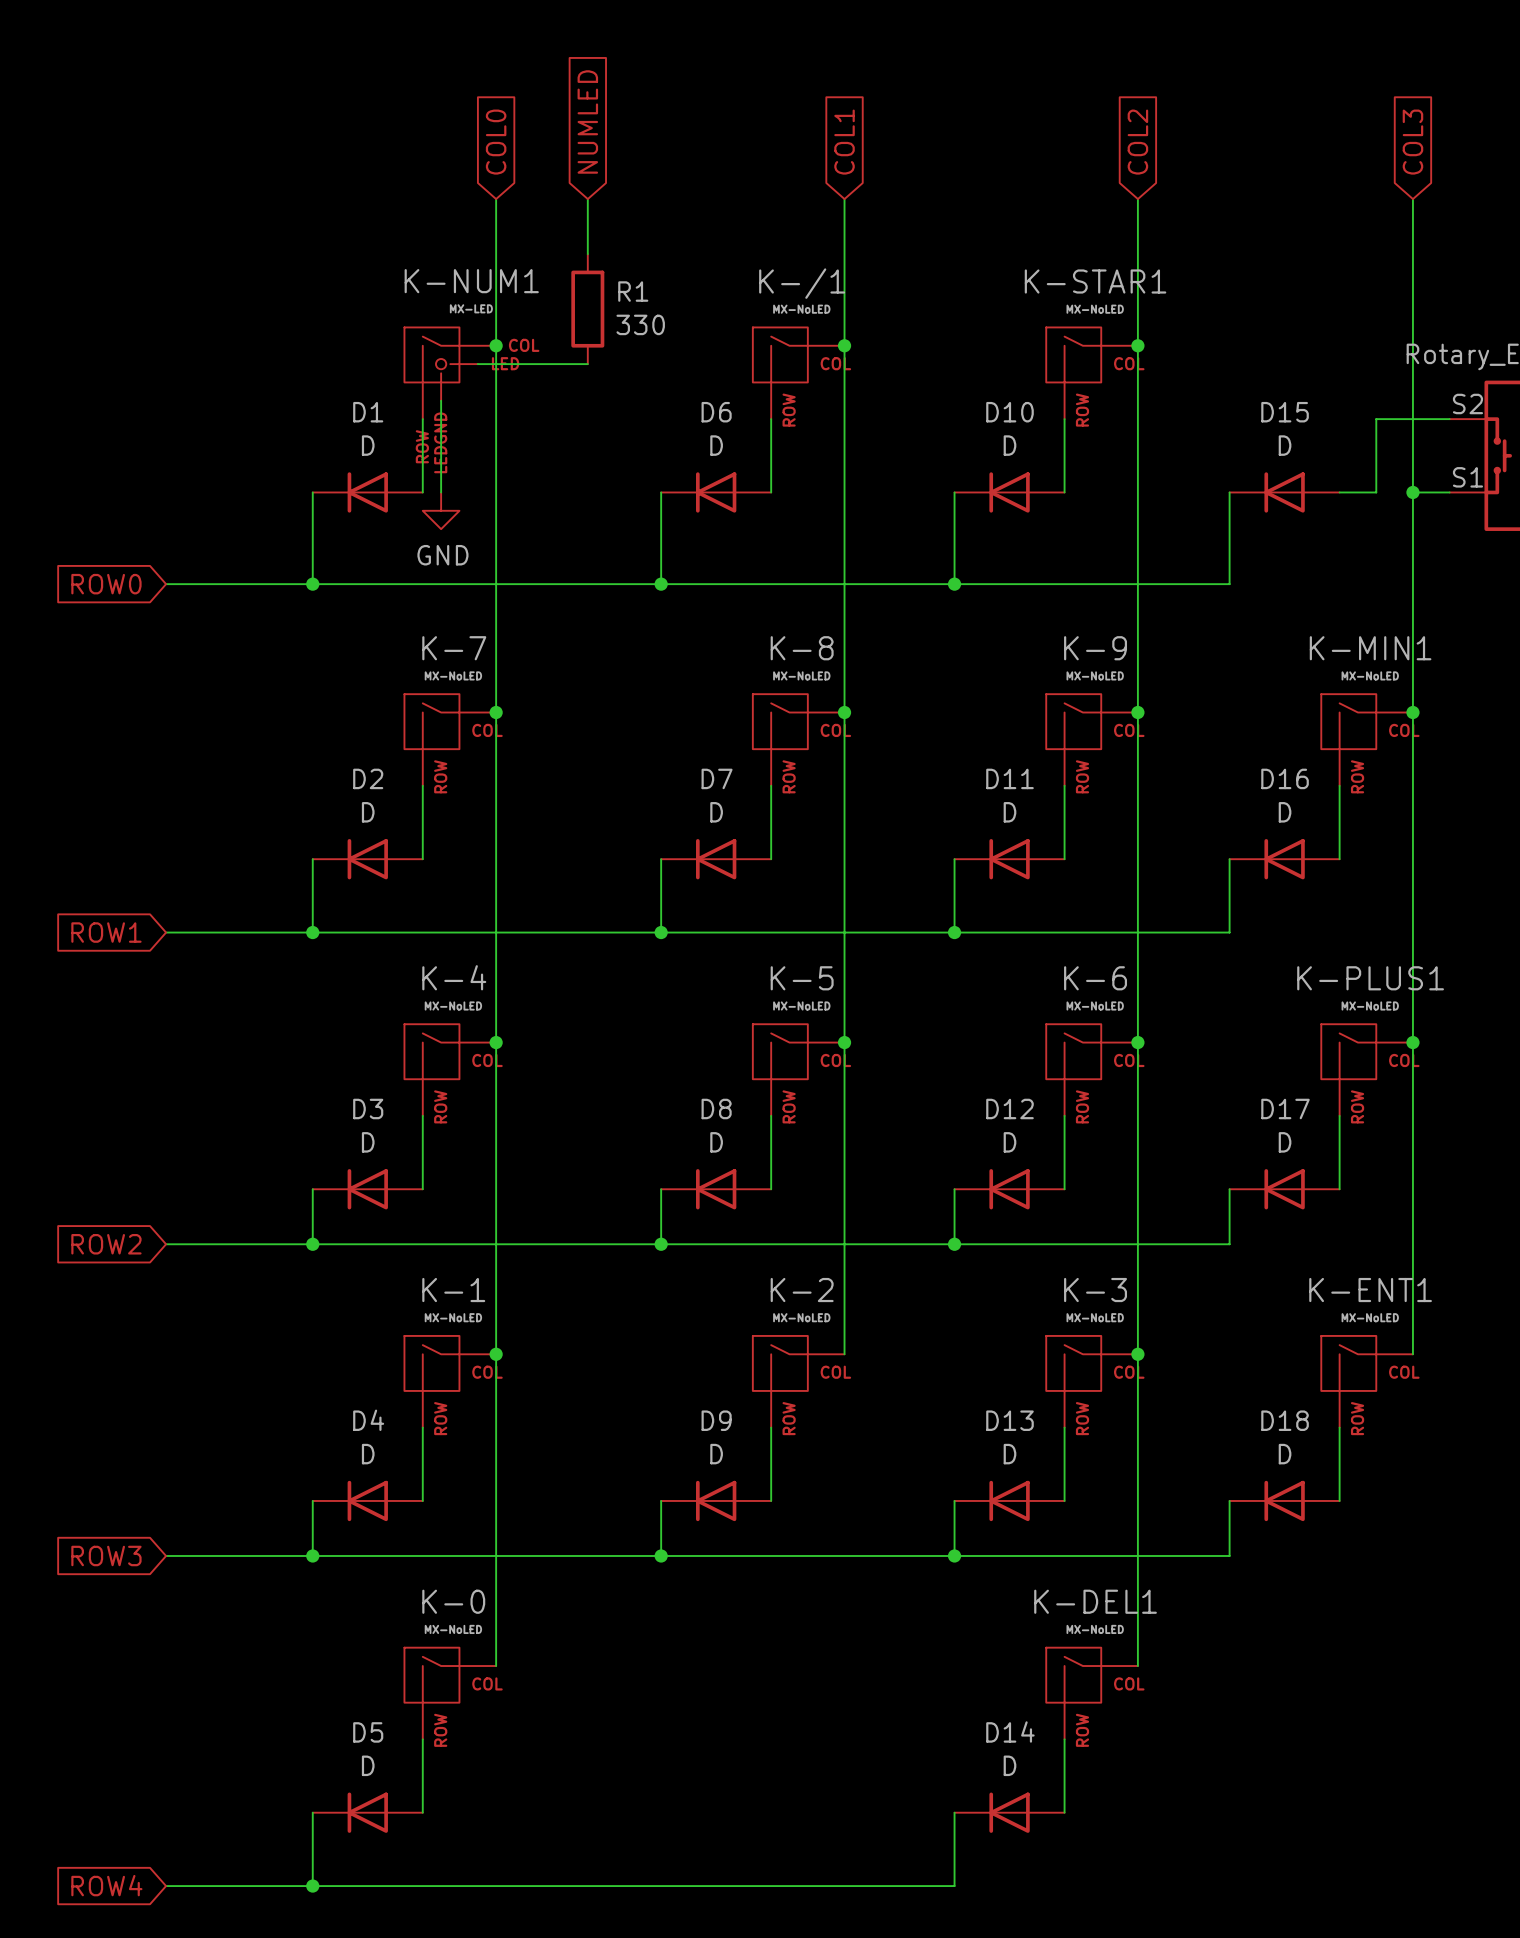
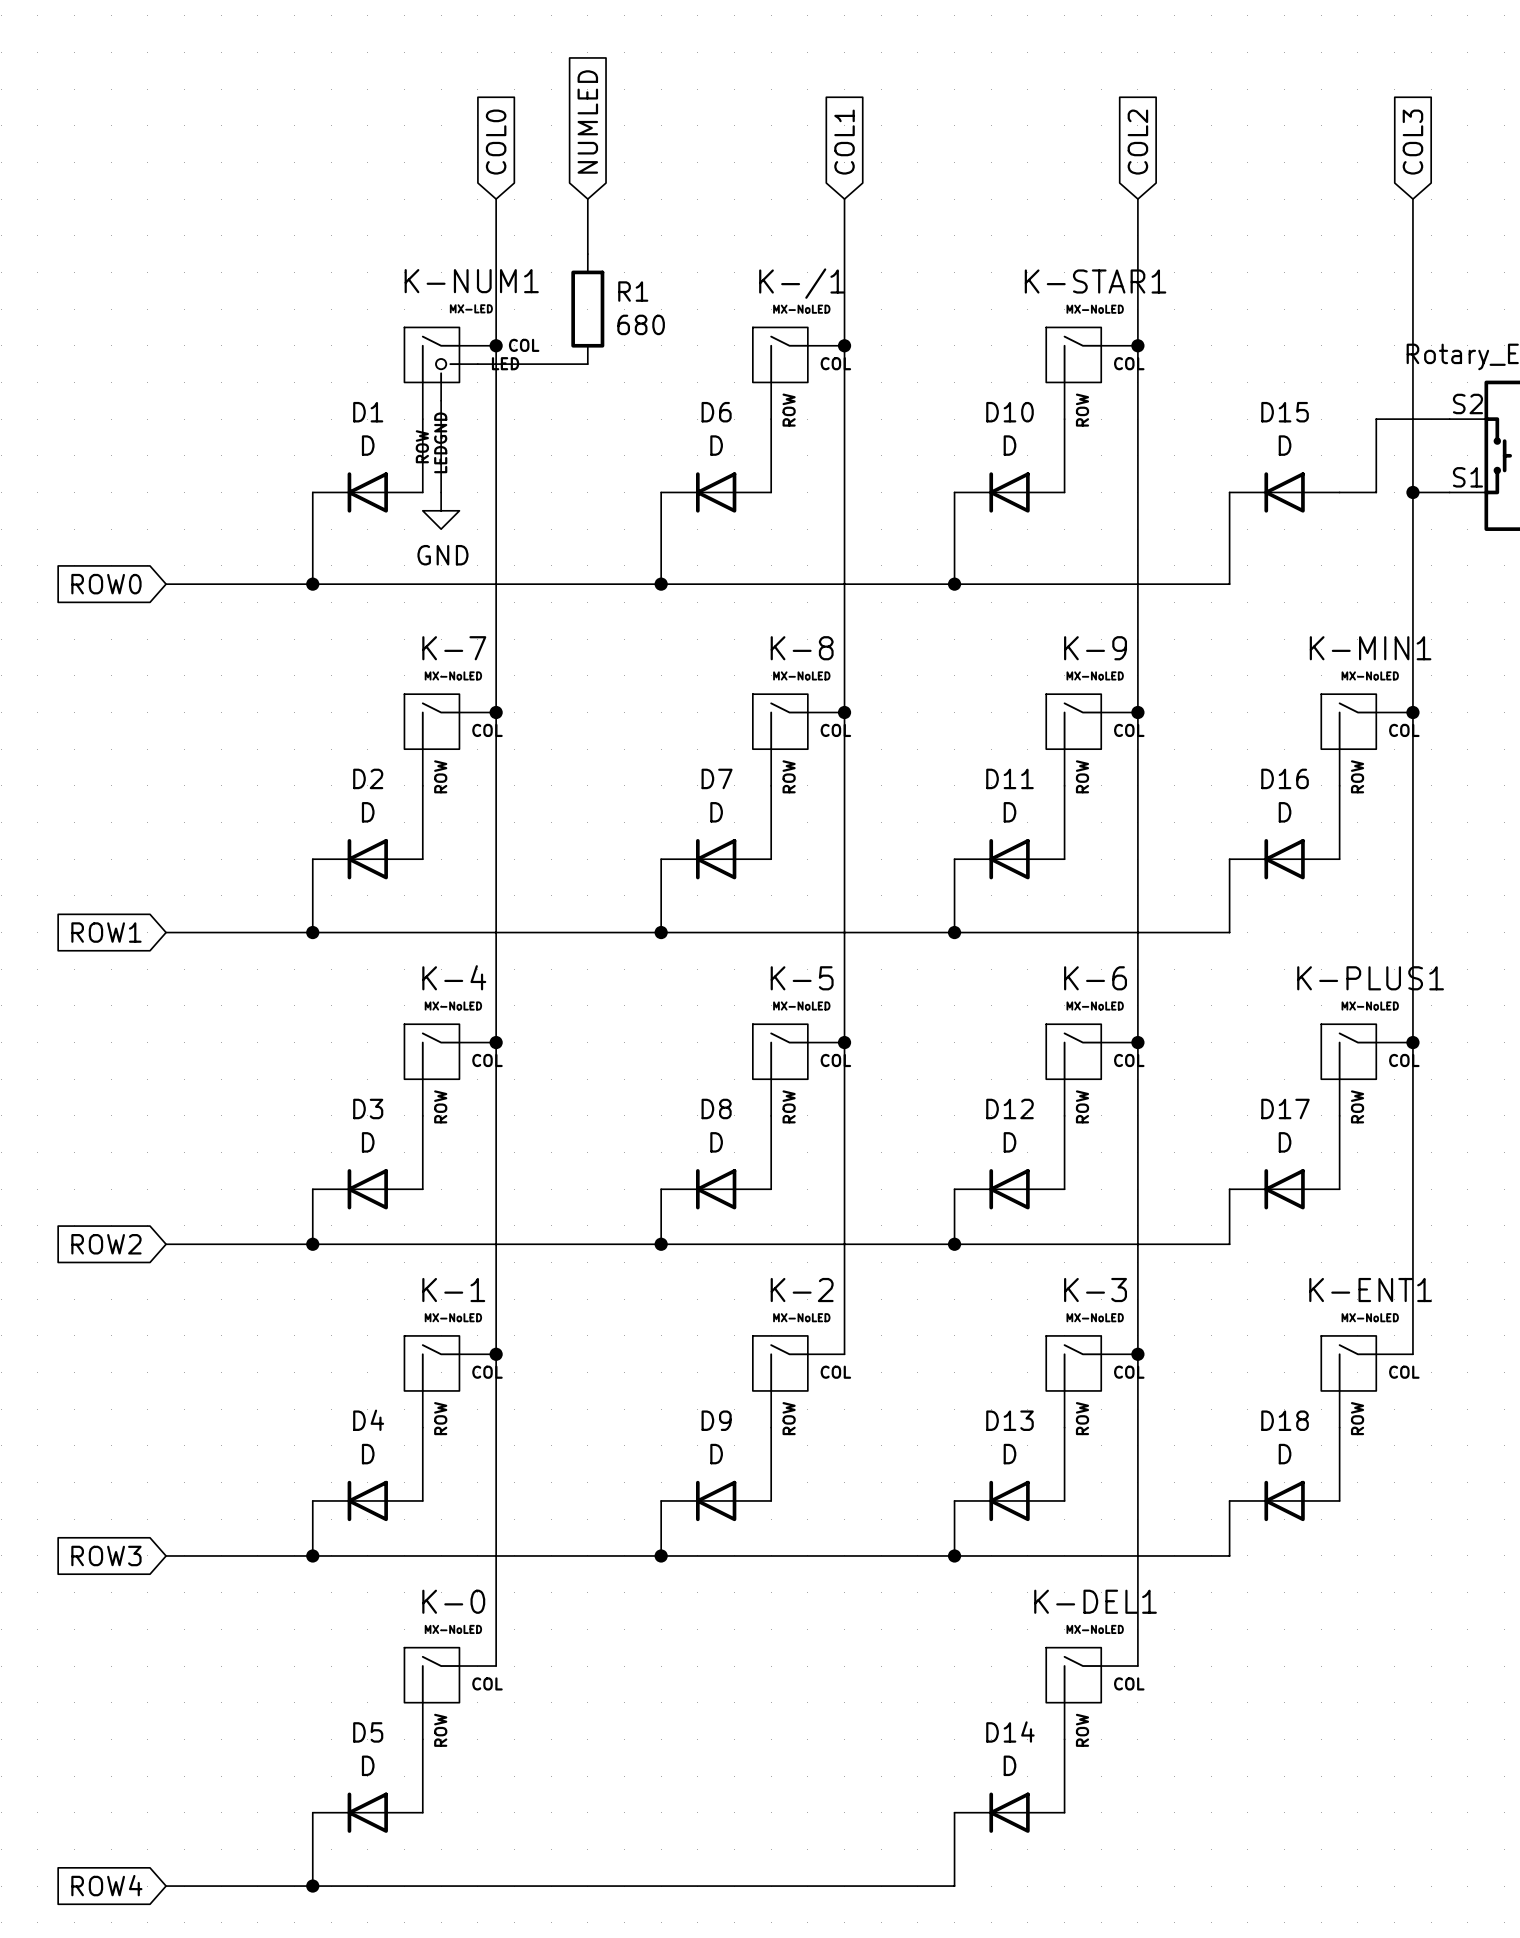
R1 value: 330 (640, 324) -> 680 (641, 324)

